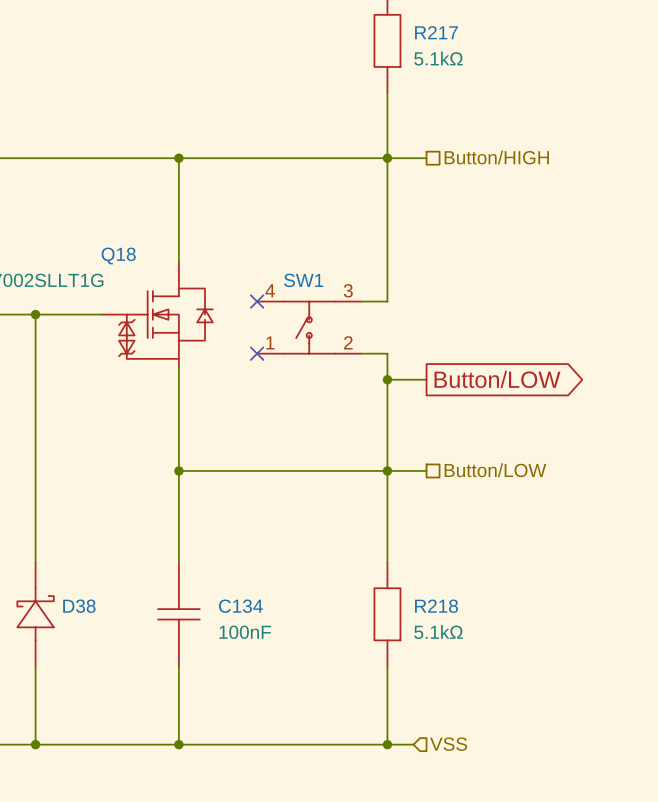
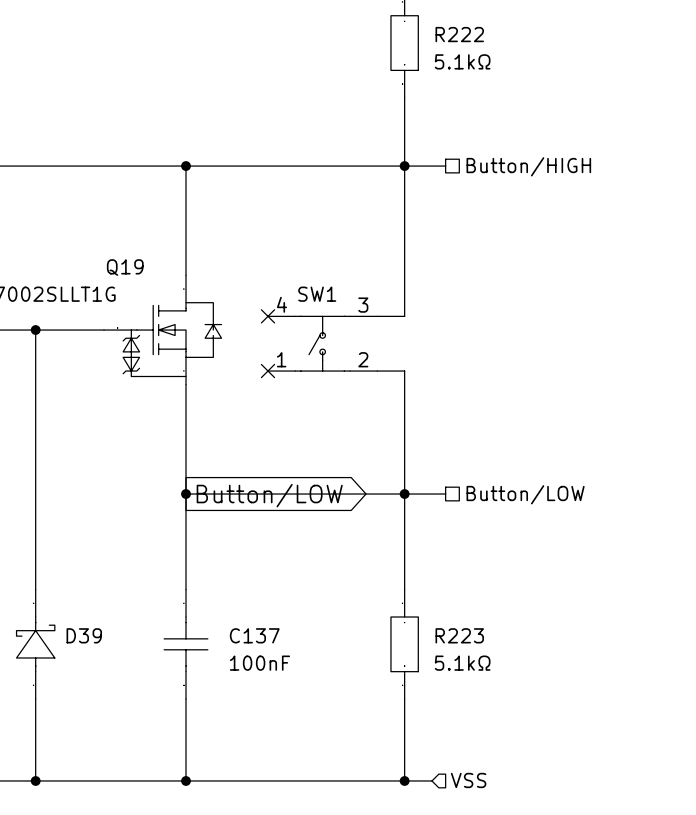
R217 name: R217 (436, 32) -> R222 (459, 34)
Q18 name: Q18 (118, 256) -> Q19 (125, 267)
wire: (387, 379) (426, 379) -> none
junction: (387, 379) -> none
global label: Button/LOW (497, 379) -> none
global label: none -> Button/LOW (269, 495)
D38 name: D38 (79, 606) -> D39 (84, 635)
C134 name: C134 (240, 606) -> C137 (254, 635)
R218 name: R218 (436, 606) -> R223 (459, 635)

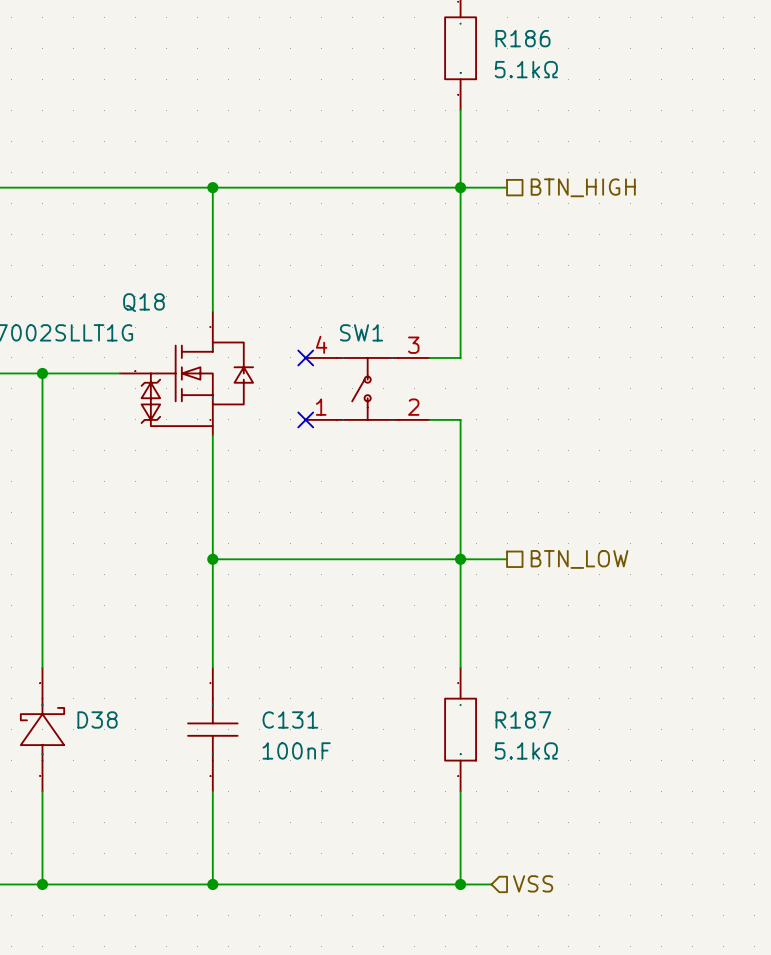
R222 name: R222 (459, 34) -> R186 (523, 38)
hierarchical label: Button/HIGH (528, 166) -> BTN_HIGH (583, 187)
Q19 name: Q19 (125, 267) -> Q18 (143, 302)
hierarchical label: Button/LOW (525, 494) -> BTN_LOW (579, 559)
global label: Button/LOW (269, 495) -> none
D39 name: D39 (84, 635) -> D38 (97, 719)
C137 name: C137 (254, 635) -> C131 (290, 719)
R223 name: R223 (459, 635) -> R187 (523, 719)

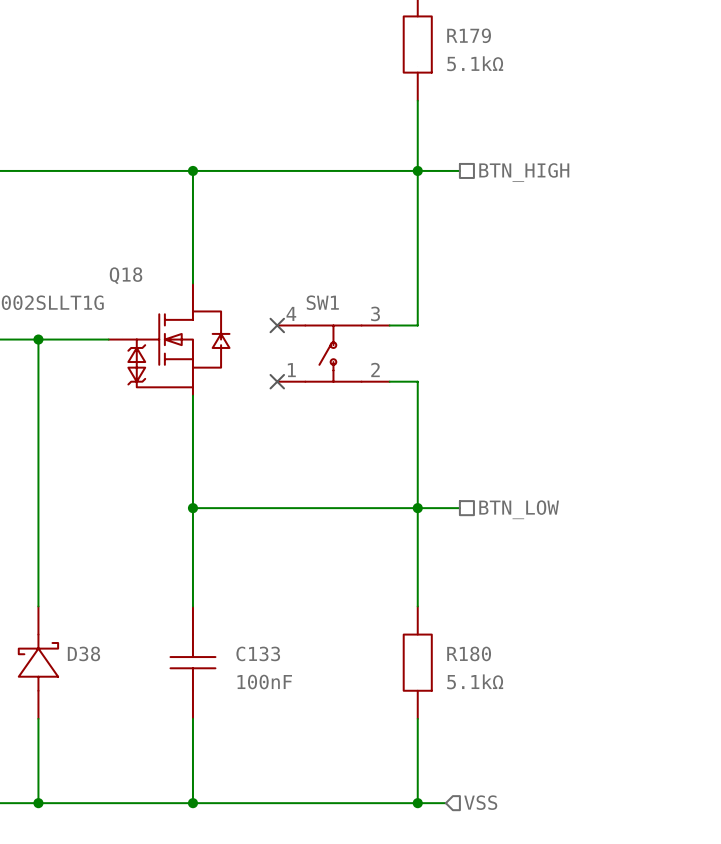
R186 name: R186 (523, 38) -> R179 (469, 35)
C131 name: C131 (290, 719) -> C133 (258, 653)
R187 name: R187 (523, 719) -> R180 (469, 653)

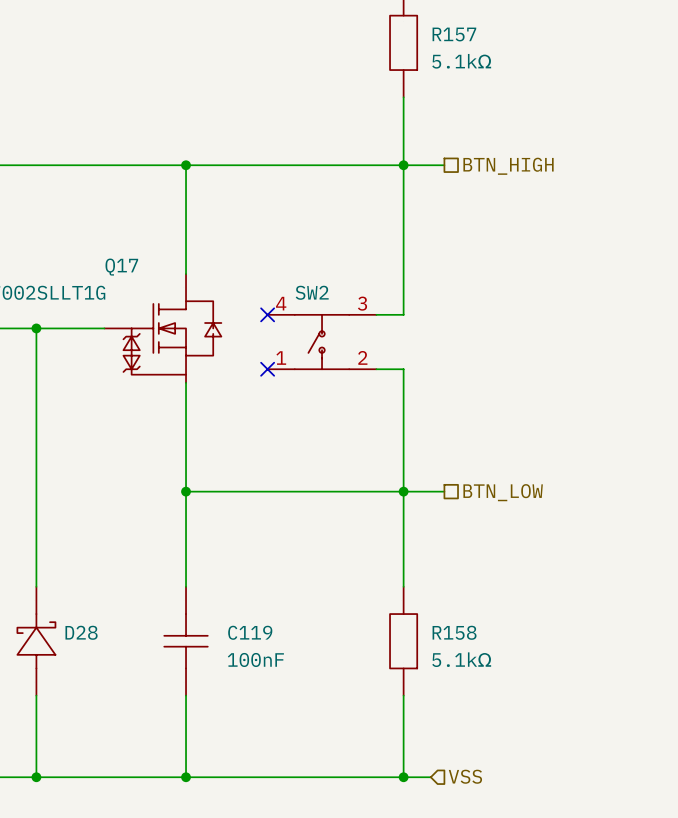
R179 name: R179 (469, 35) -> R157 (454, 34)
Q18 name: Q18 (126, 275) -> Q17 (121, 267)
SW1 name: SW1 (322, 302) -> SW2 (312, 292)
D38 name: D38 (83, 653) -> D28 (81, 632)
C133 name: C133 (258, 653) -> C119 (250, 632)
R180 name: R180 (469, 653) -> R158 (454, 632)

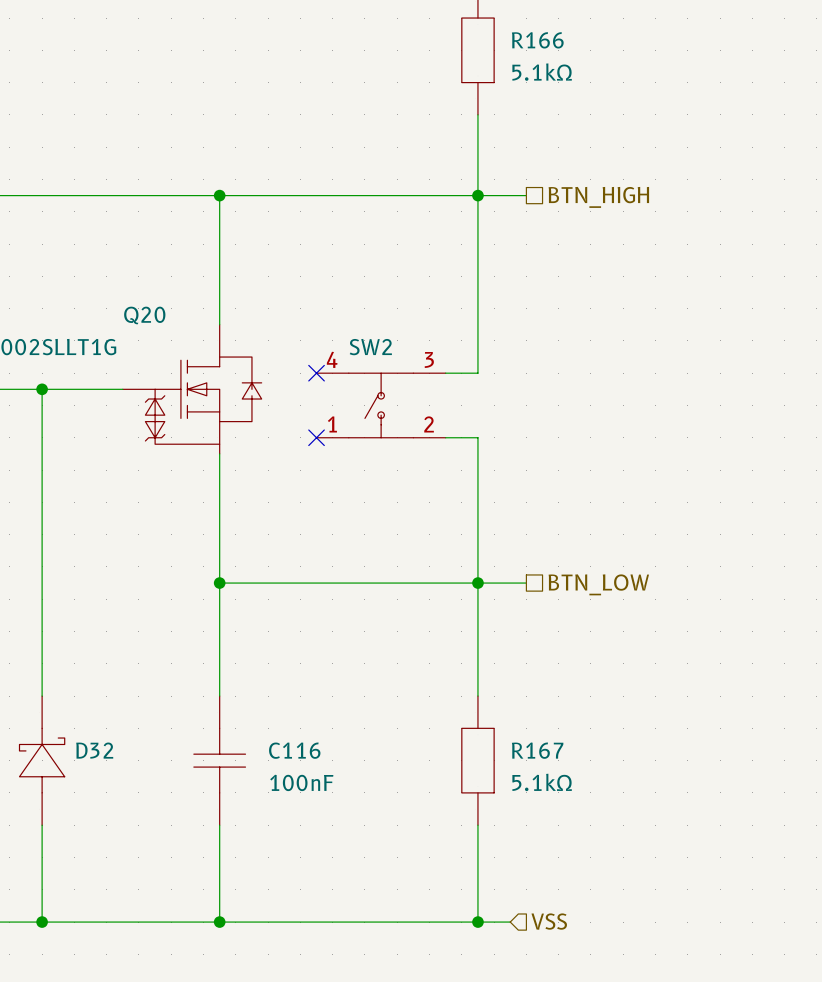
R157 name: R157 (454, 34) -> R166 (537, 40)
Q17 name: Q17 (121, 267) -> Q20 (144, 315)
D28 name: D28 (81, 632) -> D32 (94, 750)
C119 name: C119 (250, 632) -> C116 (294, 750)
R158 name: R158 (454, 632) -> R167 (537, 750)

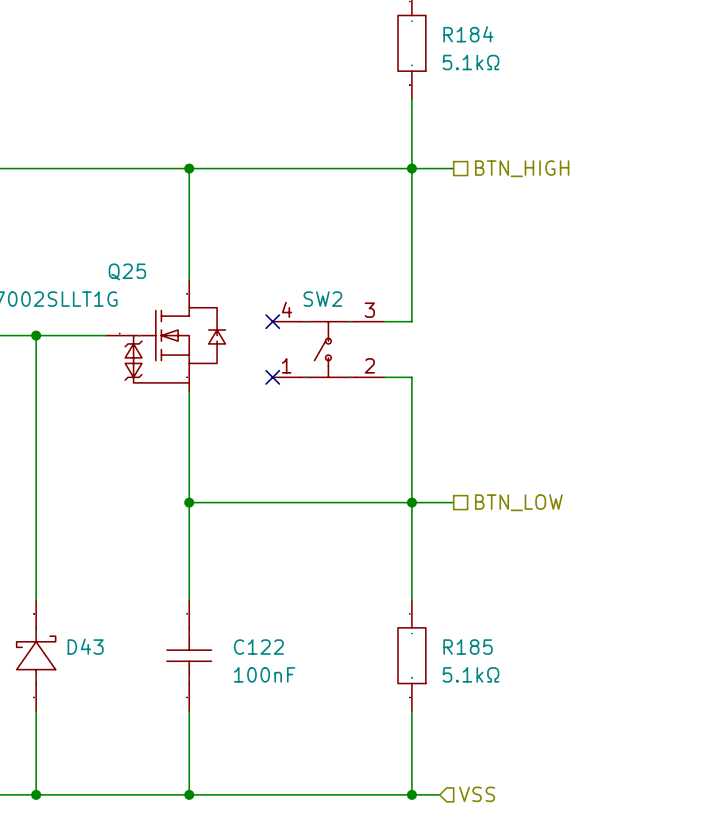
R166 name: R166 (537, 40) -> R184 (468, 34)
Q20 name: Q20 (144, 315) -> Q25 (127, 271)
D32 name: D32 (94, 750) -> D43 (85, 646)
C116 name: C116 (294, 750) -> C122 (258, 647)
R167 name: R167 (537, 750) -> R185 (468, 647)

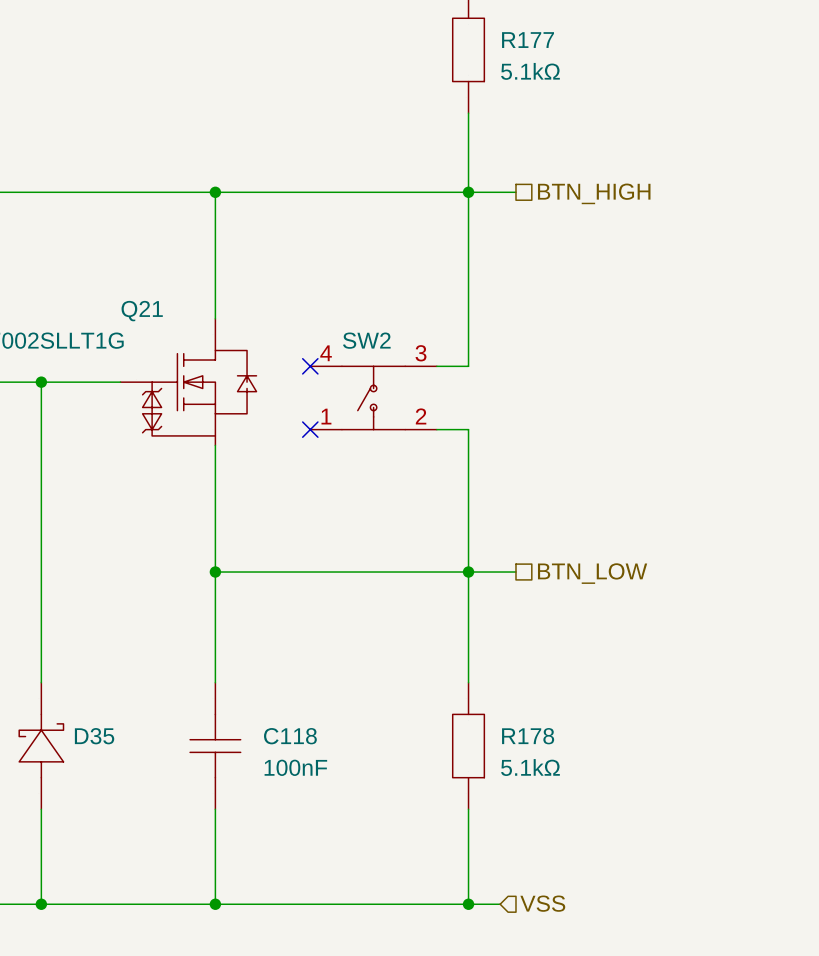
R184 name: R184 (468, 34) -> R177 (528, 40)
Q25 name: Q25 (127, 271) -> Q21 (142, 311)
D43 name: D43 (85, 646) -> D35 (94, 736)
C122 name: C122 (258, 647) -> C118 (290, 736)
R185 name: R185 (468, 647) -> R178 (528, 736)

